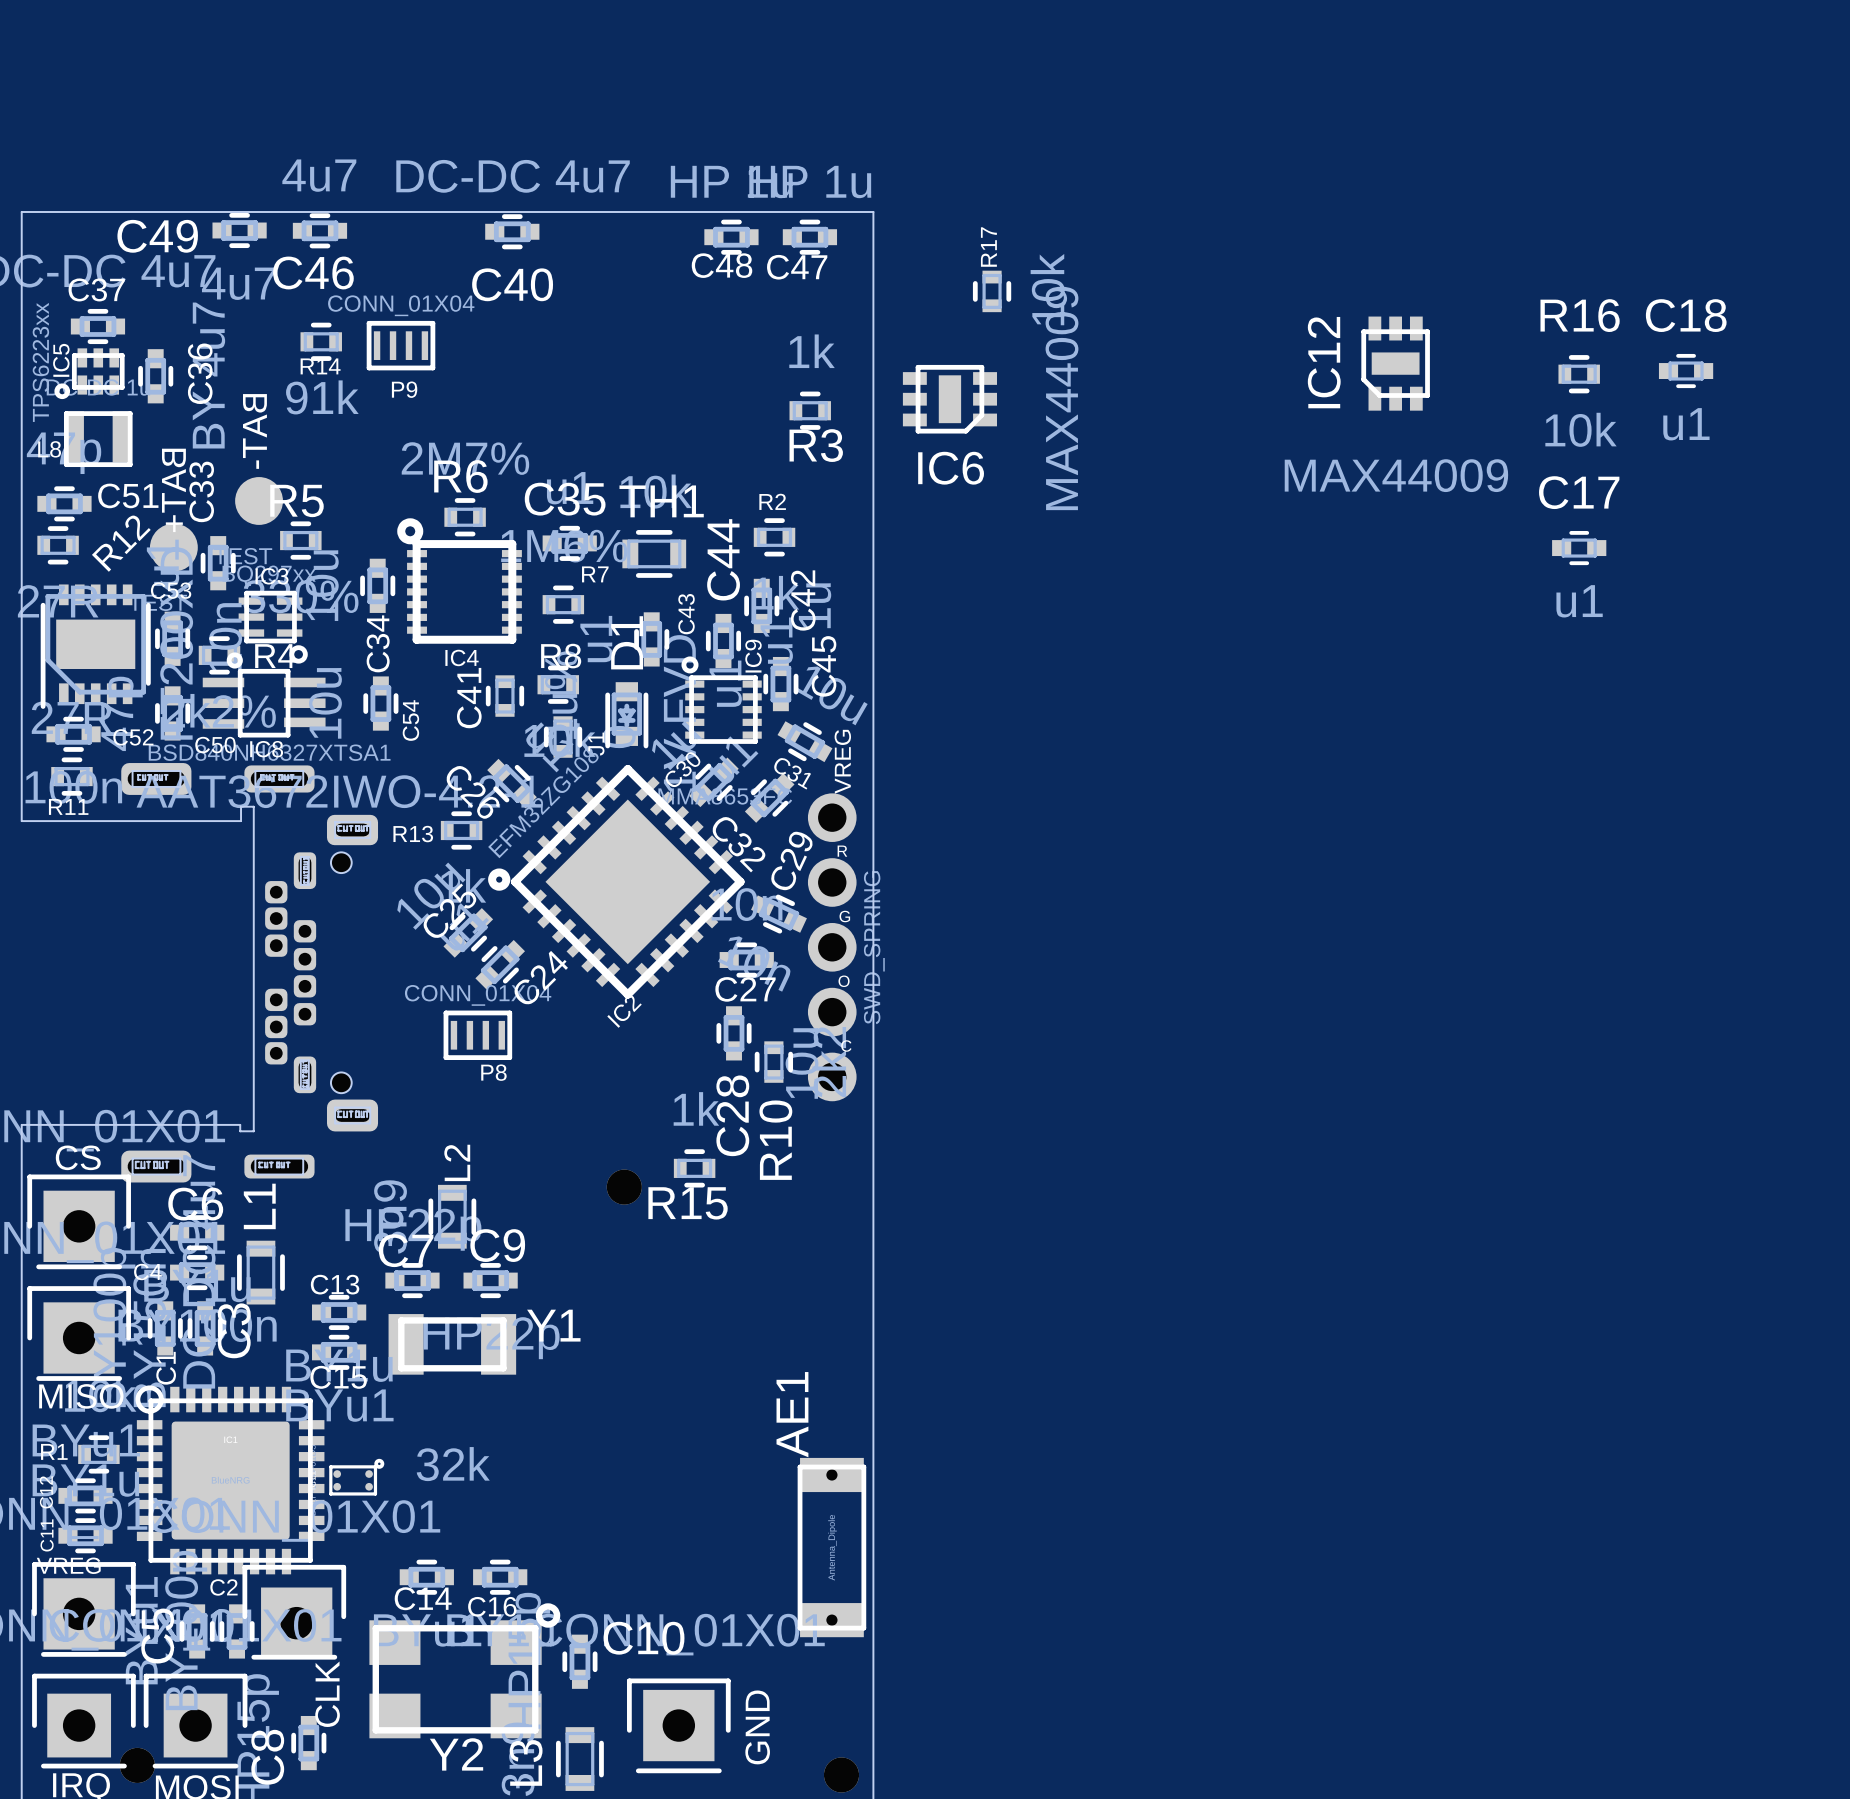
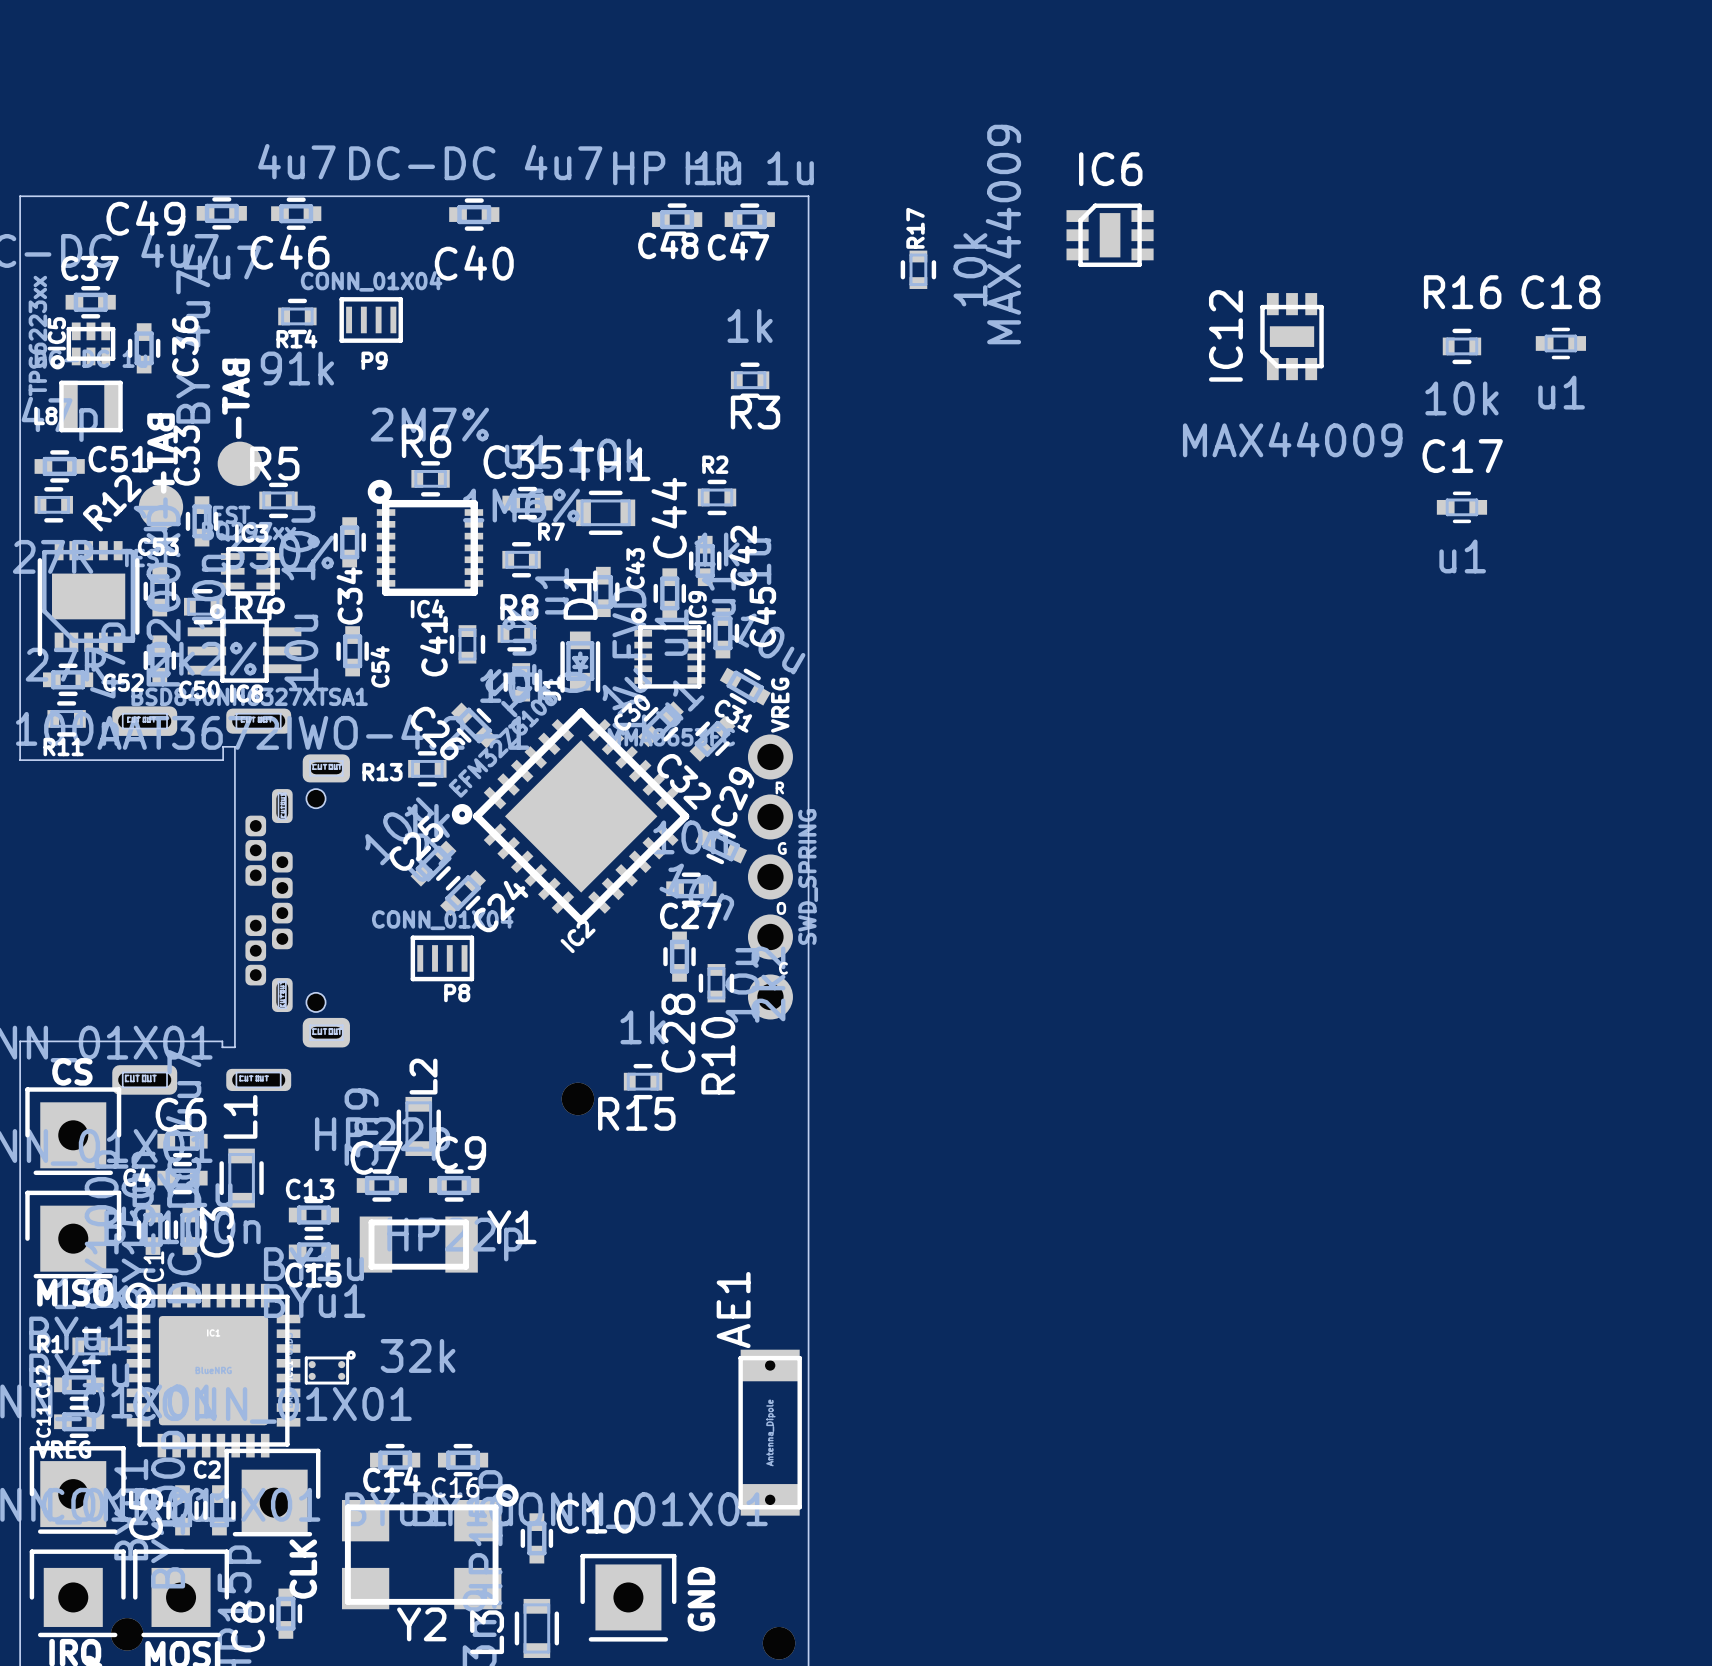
IC6 rotation: 0° (949, 399) -> 180° (1110, 235)
IC6 position: (949, 399) -> (1110, 235)

